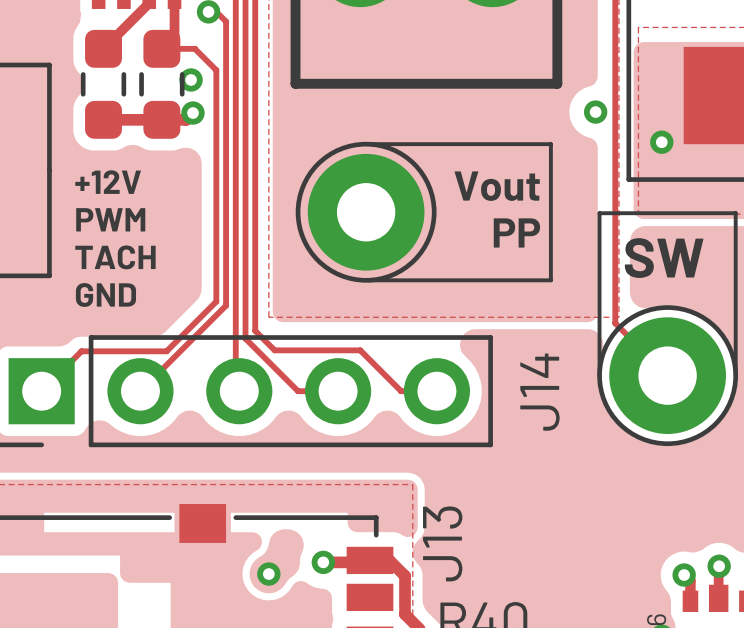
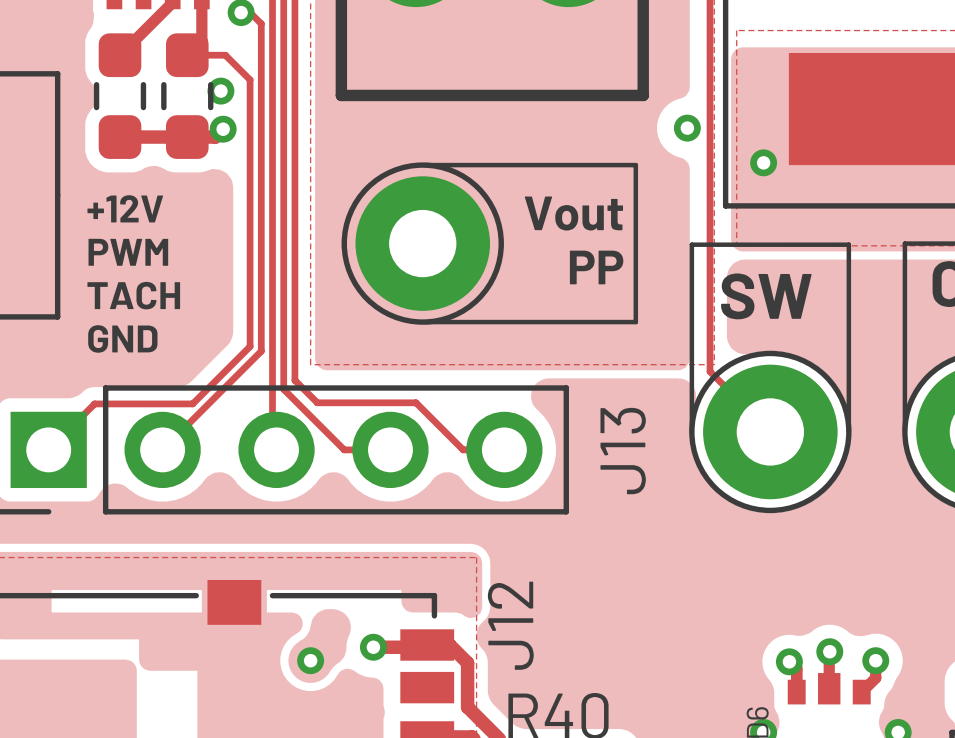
J14 name: J14 (539, 392) -> J13 (623, 451)
J13 name: J13 (442, 543) -> J12 (510, 625)

